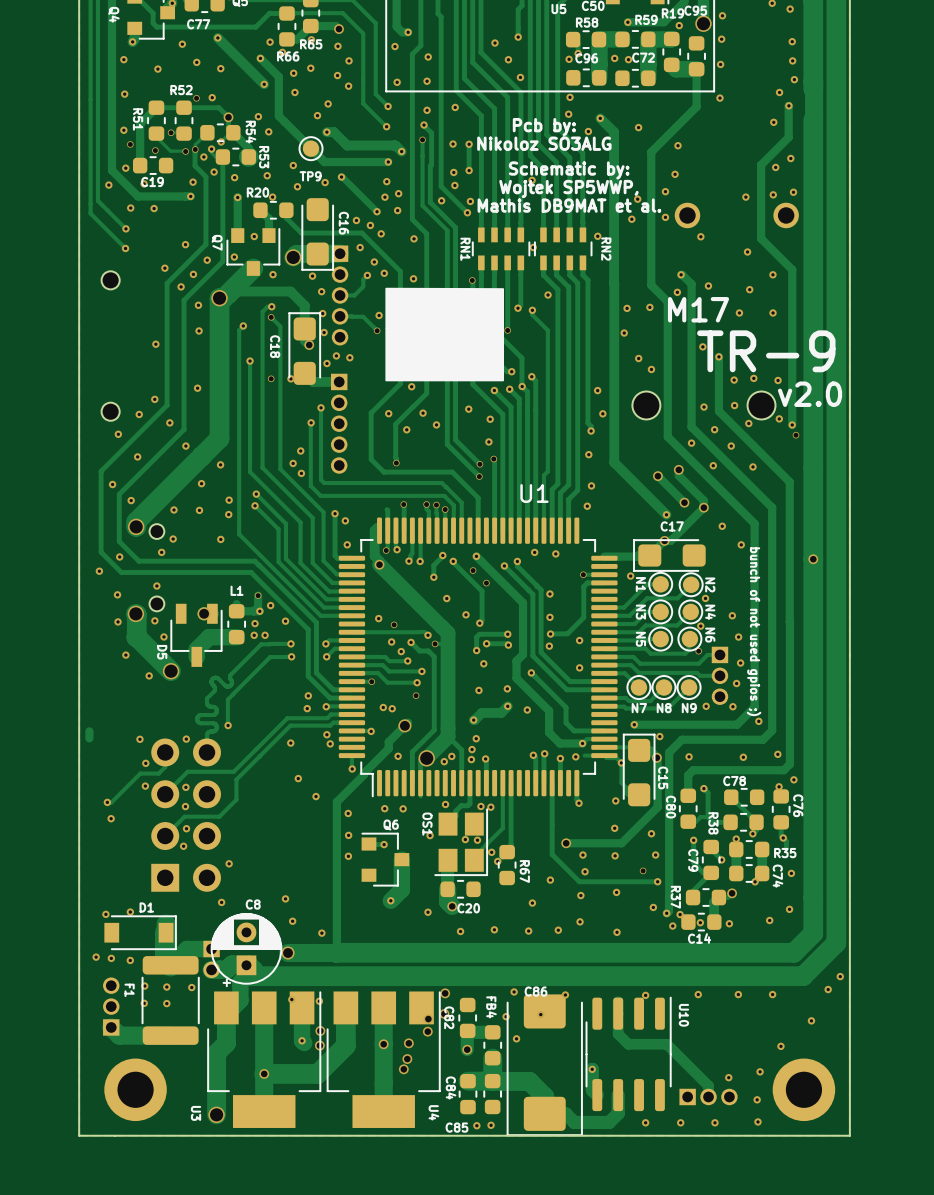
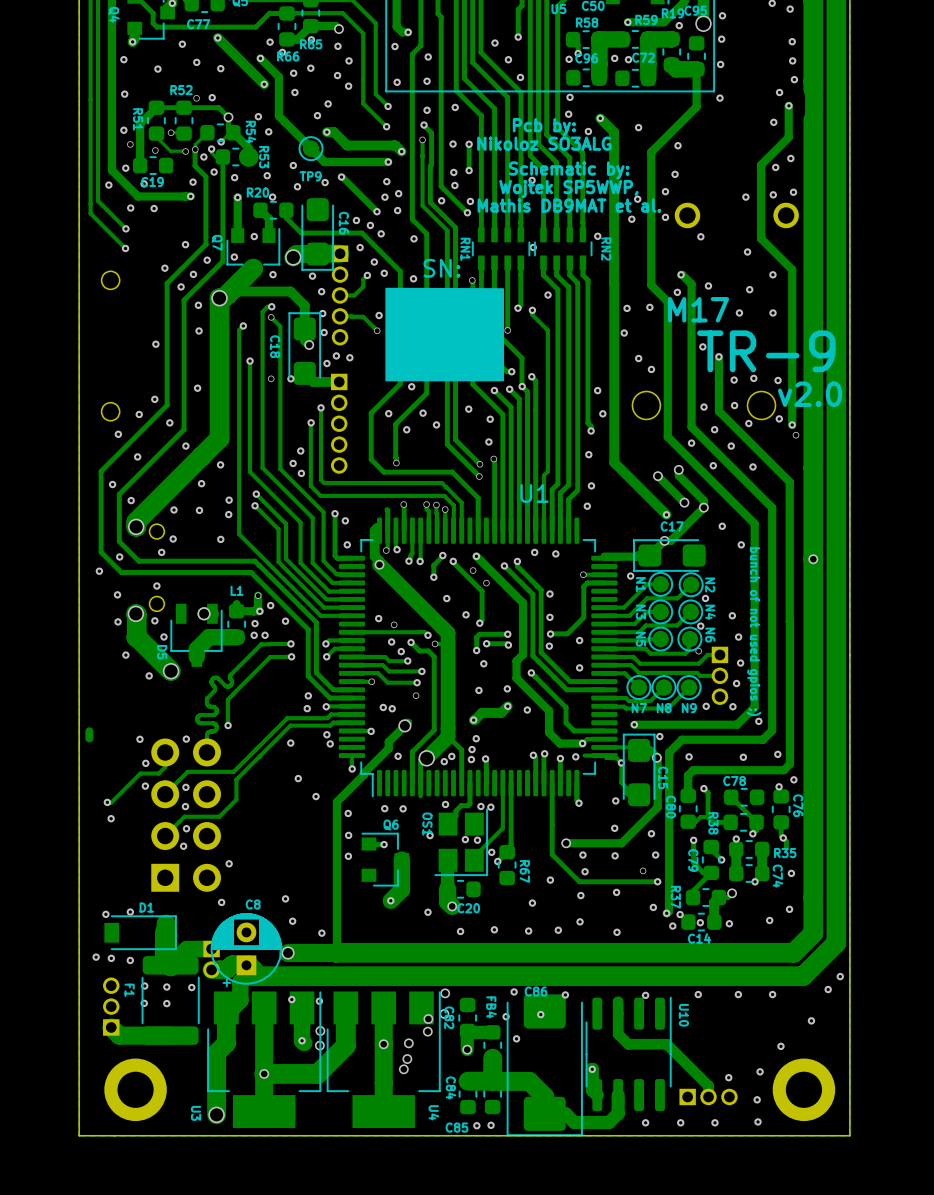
text: none -> SN: (441, 268)

